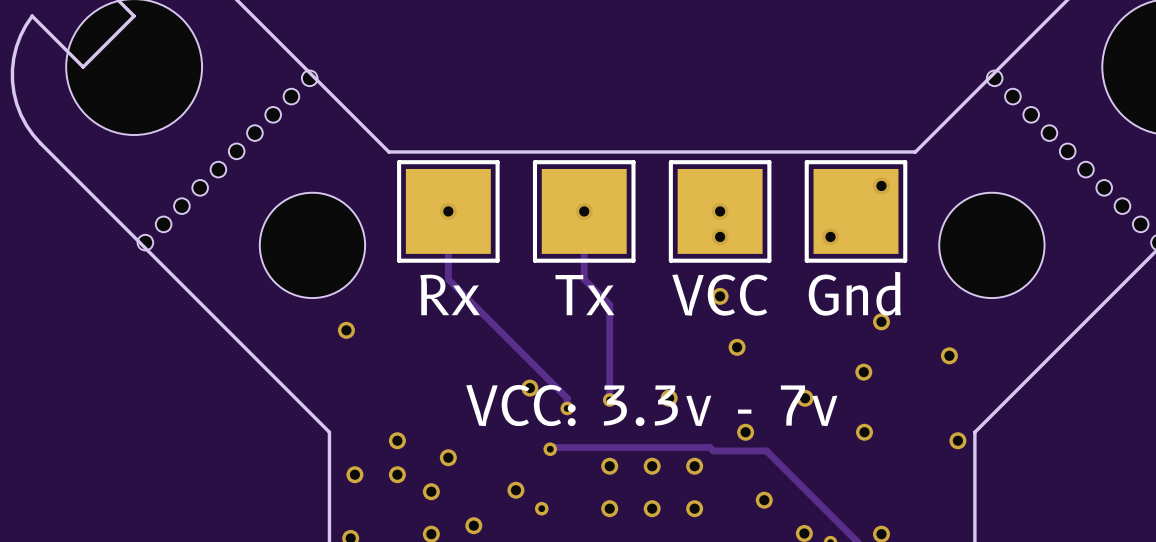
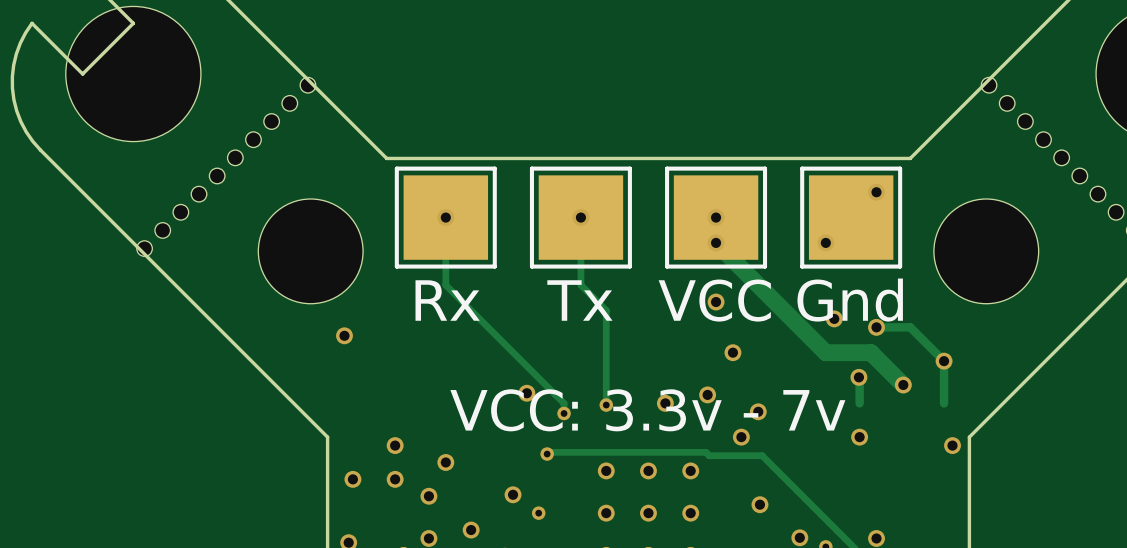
track: none -> (716, 242) (825, 352) (871, 352) (903, 384)
via: none -> (834, 318)
track: none -> (876, 327) (910, 327) (944, 361) (944, 403)
track: none -> (858, 377) (859, 403)
via: none -> (903, 384)
via: none -> (707, 394)
via position: (805, 398) -> (758, 411)

